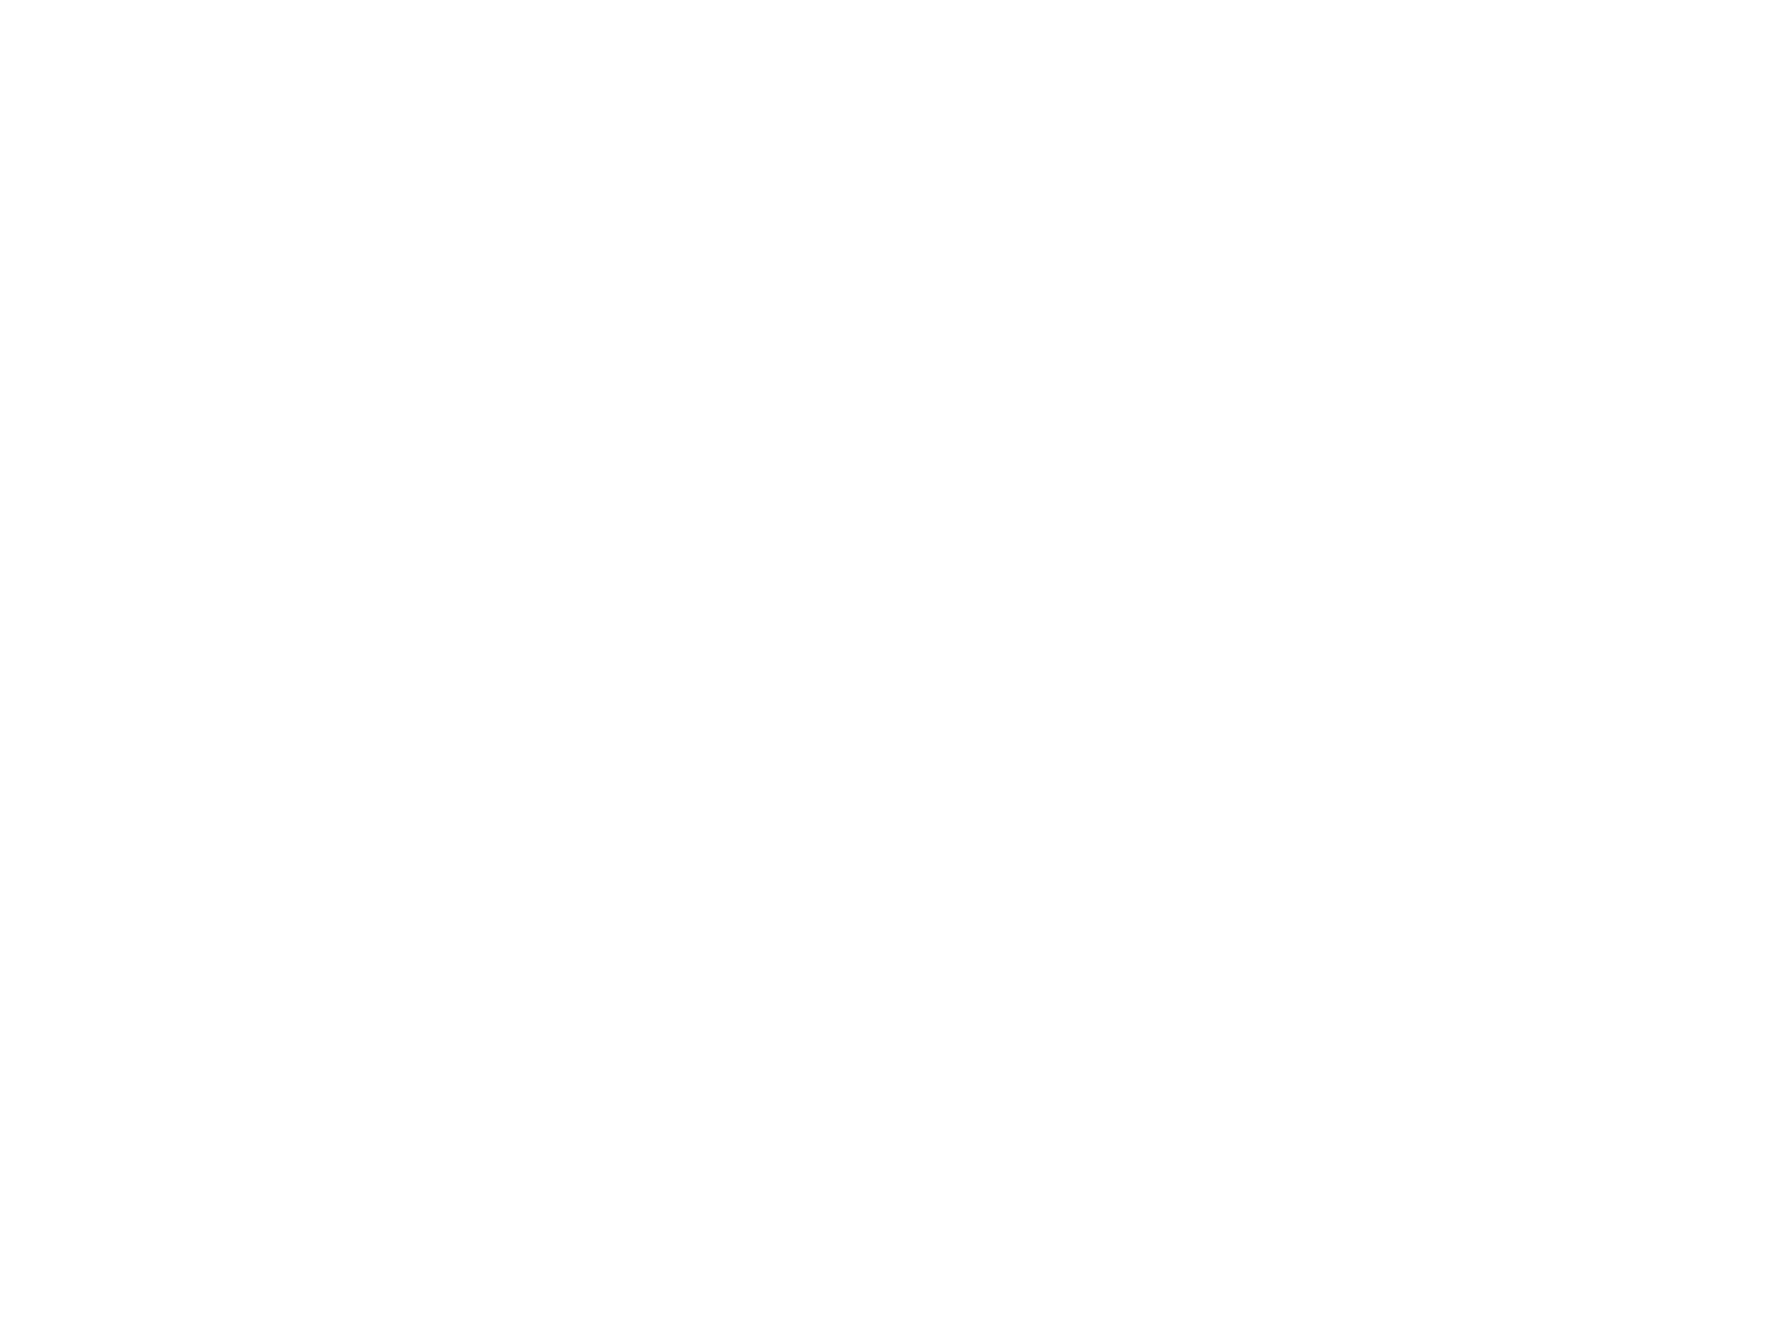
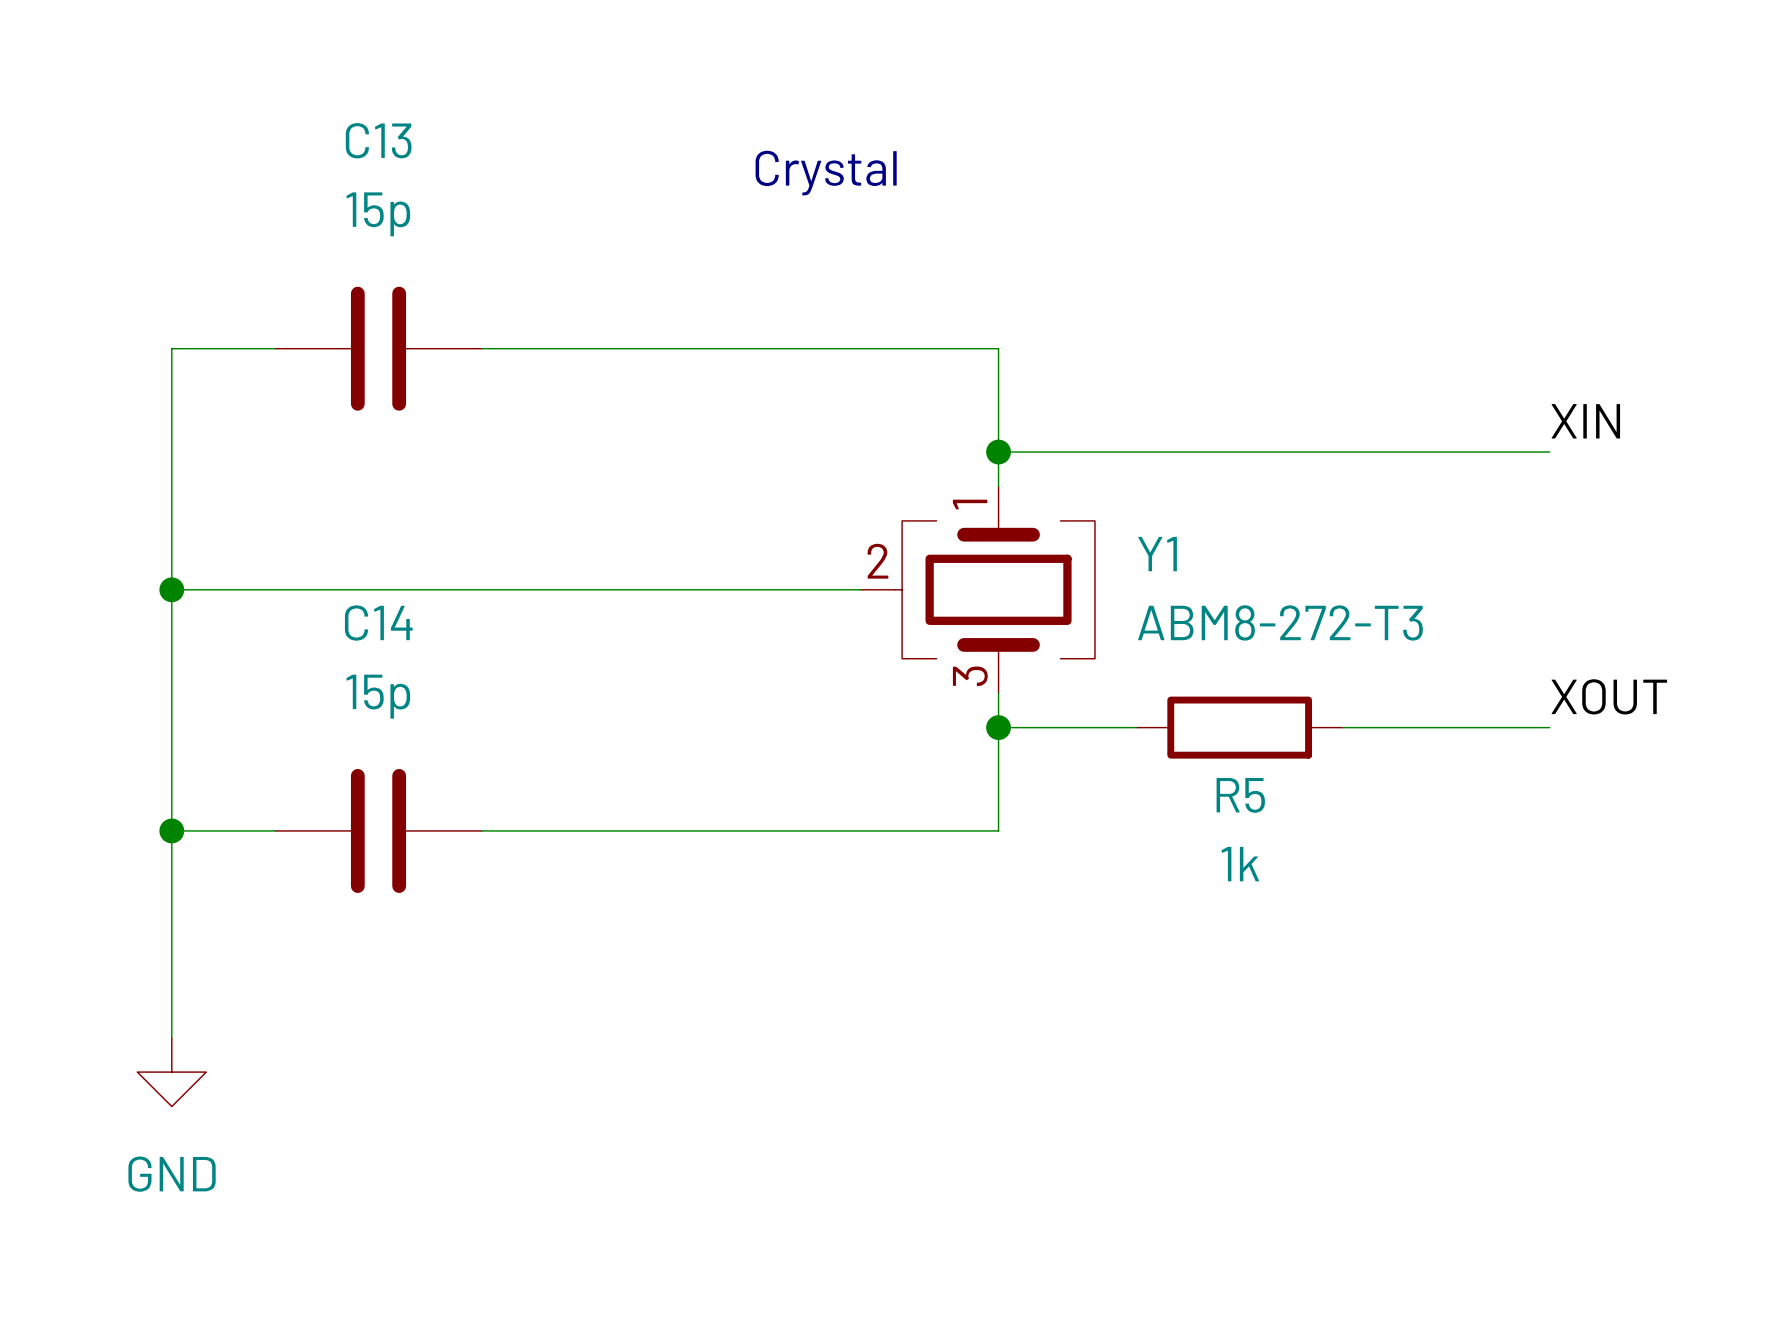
text: none -> Crystal (826, 173)
wire: none -> (275, 348) (171, 348) (171, 1037)
C13: none -> 15p (378, 348)
wire: none -> (481, 348) (998, 348) (998, 486)
label: none -> XIN (1585, 421)
wire: none -> (998, 452) (1549, 452)
junction: none -> (998, 452)
wire: none -> (171, 589) (860, 589)
junction: none -> (171, 589)
Y1: none -> ABM8-272-T3 (977, 589)
wire: none -> (998, 693) (998, 830) (481, 830)
label: none -> XOUT (1609, 696)
wire: none -> (998, 727) (1136, 727)
junction: none -> (998, 727)
R5: none -> 1k (1239, 727)
wire: none -> (1343, 727) (1549, 727)
wire: none -> (171, 830) (275, 830)
junction: none -> (171, 830)
C14: none -> 15p (378, 830)
power symbol: none -> GND (171, 1072)

